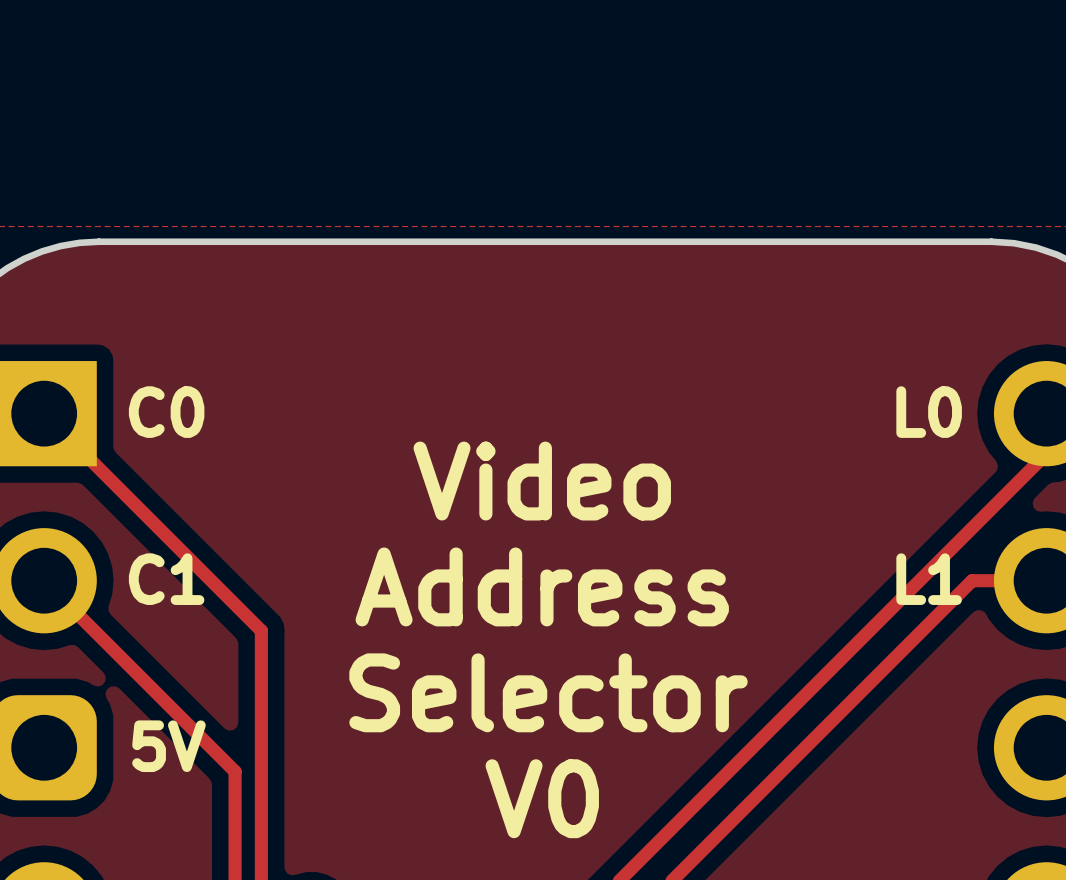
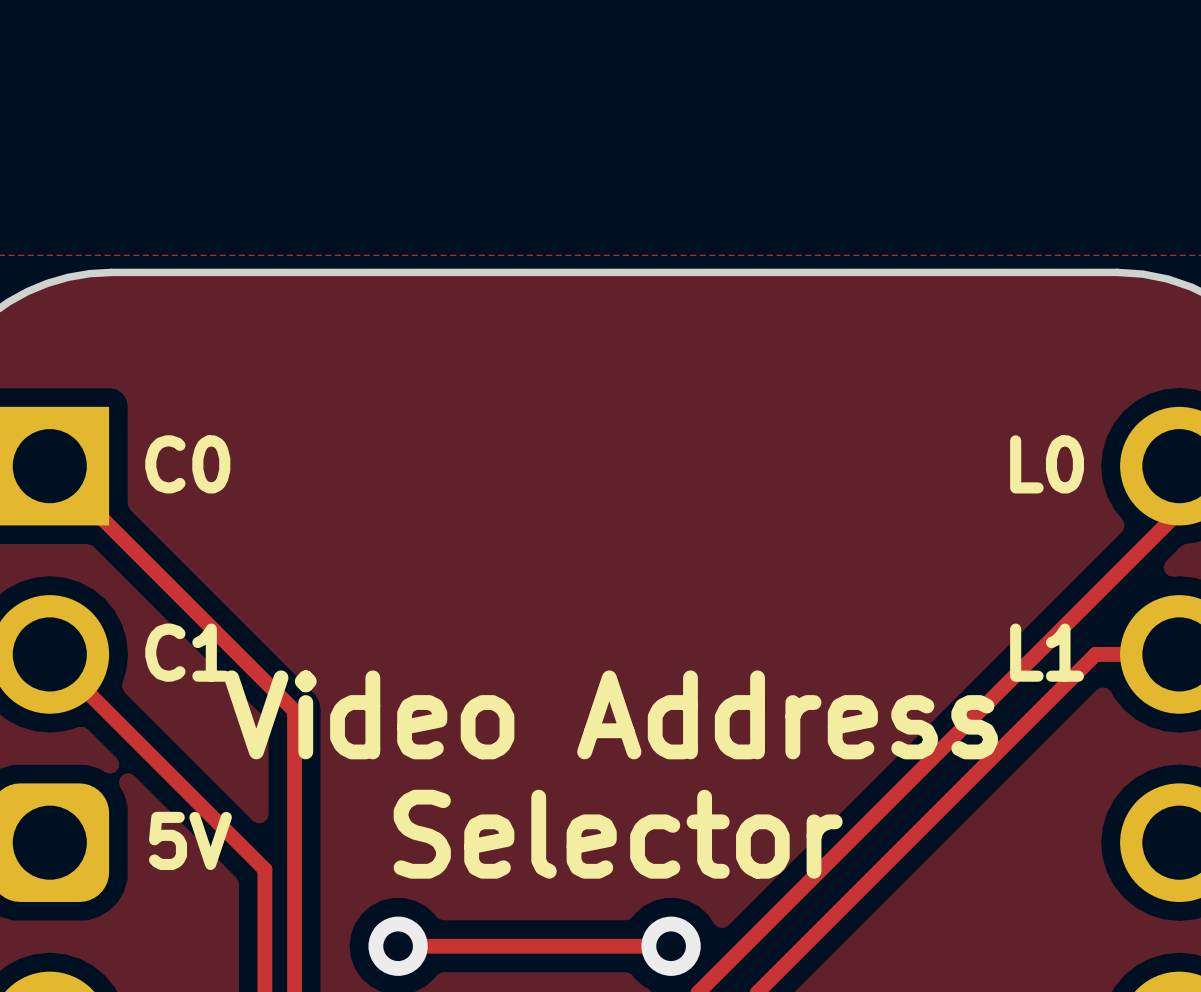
text: Video (542, 481) -> none
text: Address (542, 586) -> Video Address (611, 714)
text position: Selector (548, 692) -> Selector (618, 834)
text: V0 (542, 798) -> none
track: none -> (398, 946) (671, 946)
via: none -> (398, 946)
via: none -> (671, 946)

